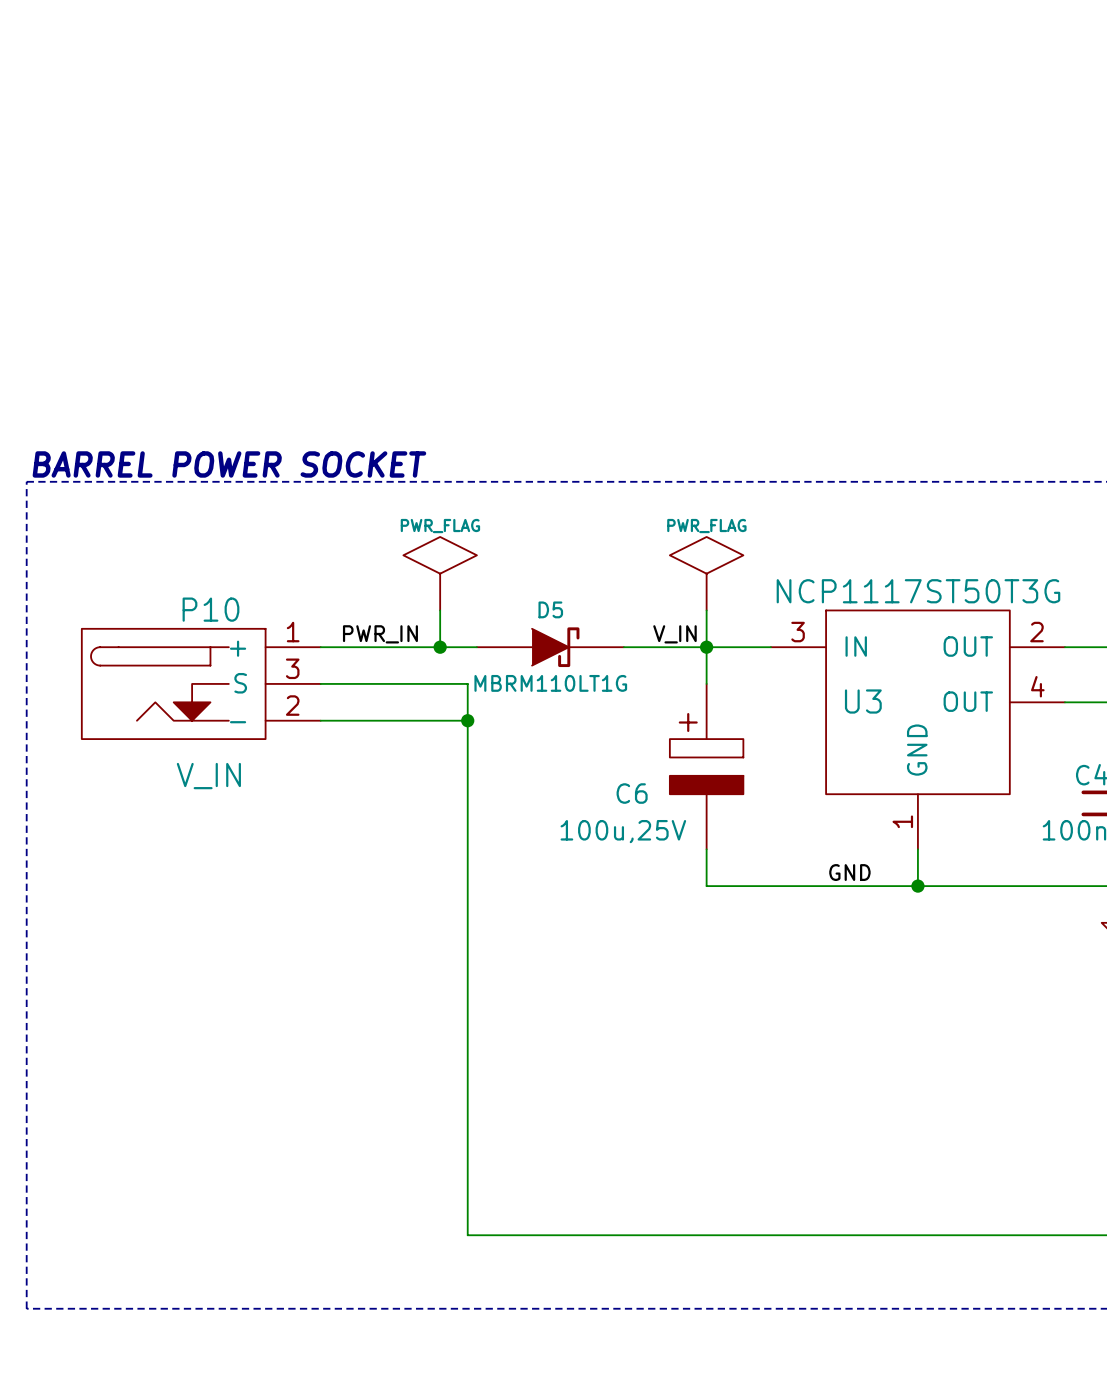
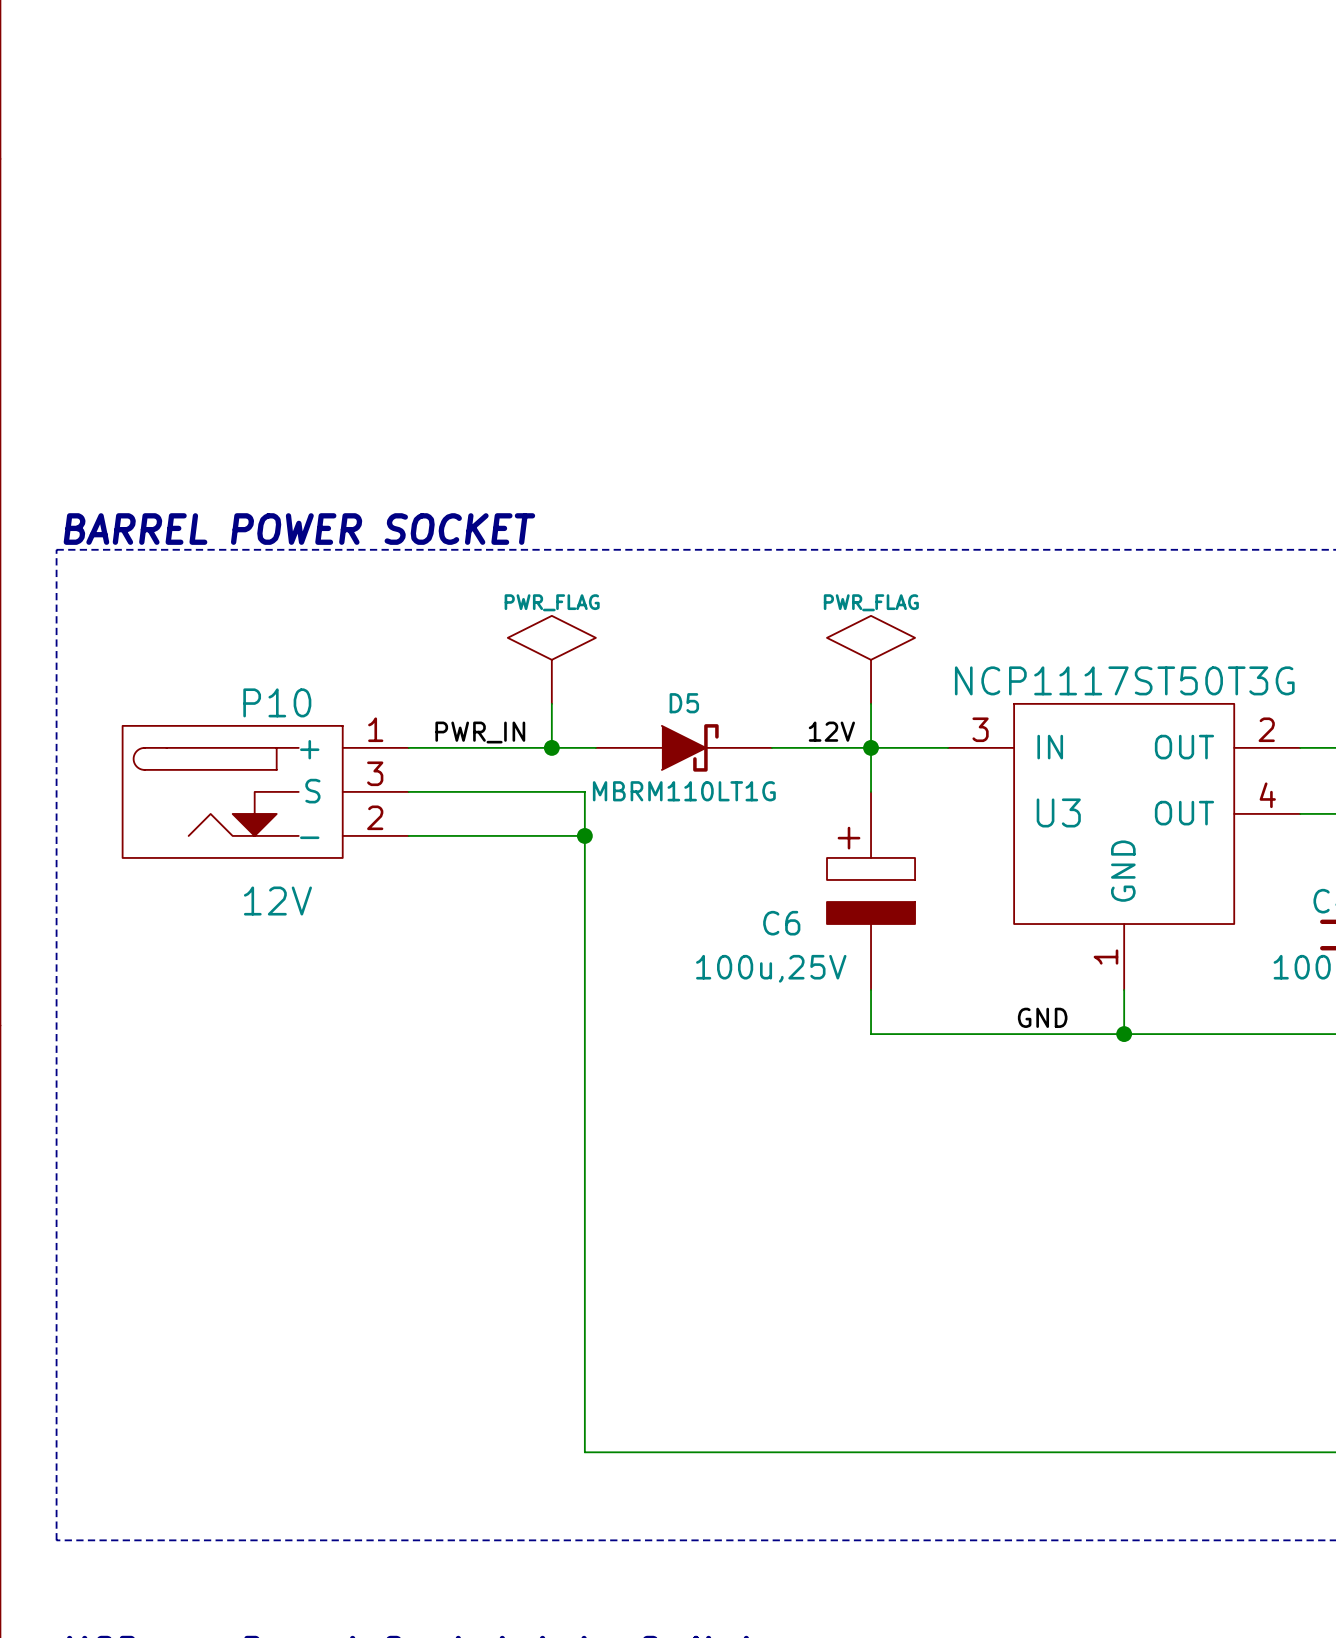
label: V_IN (674, 634) -> 12V (831, 731)
P10 value: V_IN (208, 776) -> 12V (277, 901)

